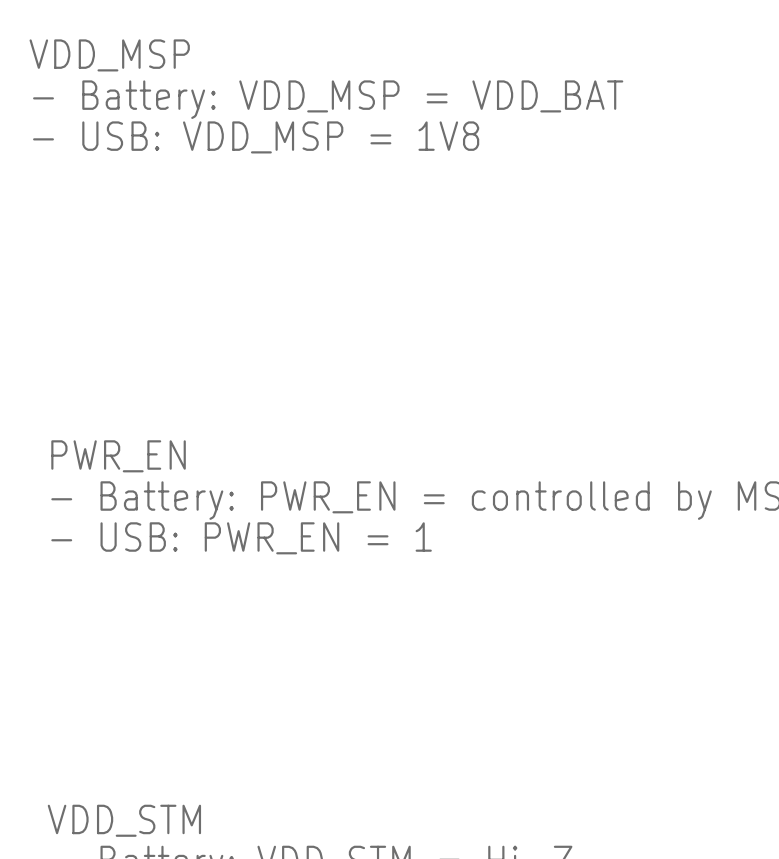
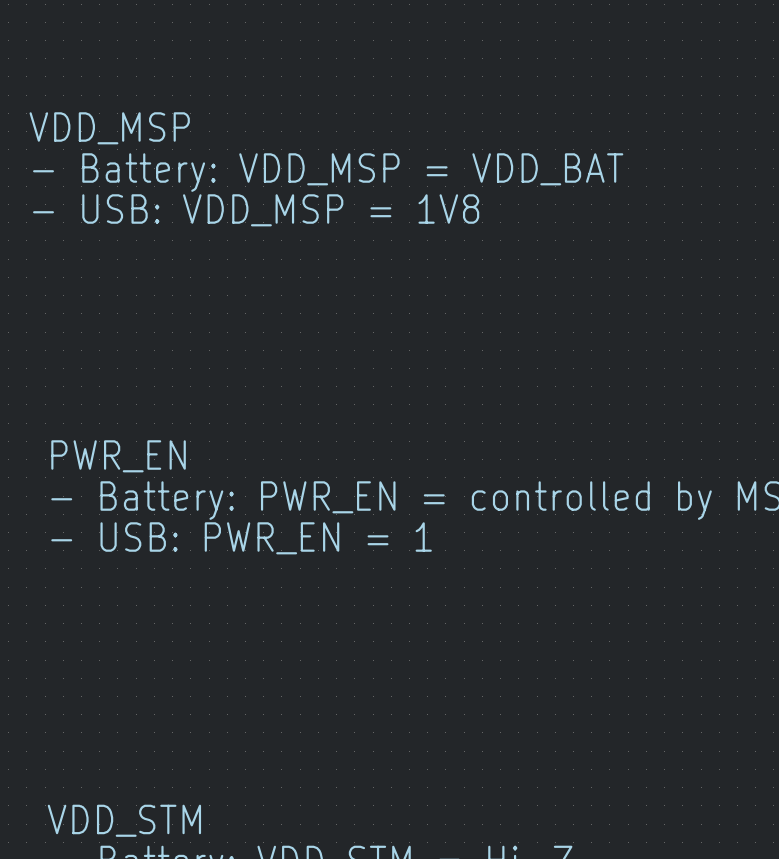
text position: VDD_MSP (109, 55) -> VDD_MSP (109, 128)
text position: - Battery: VDD_MSP = VDD_BAT (328, 99) -> - Battery: VDD_MSP = VDD_BAT (328, 172)
text position: - USB: VDD_MSP = 1V8 (256, 137) -> - USB: VDD_MSP = 1V8 (256, 210)

